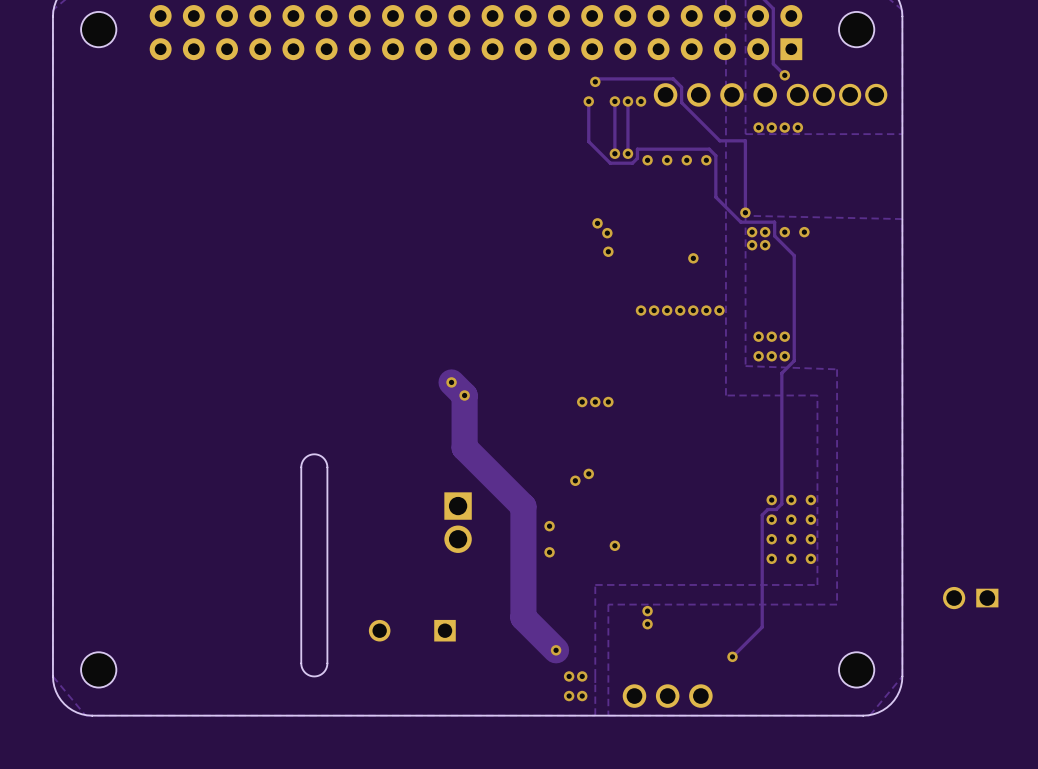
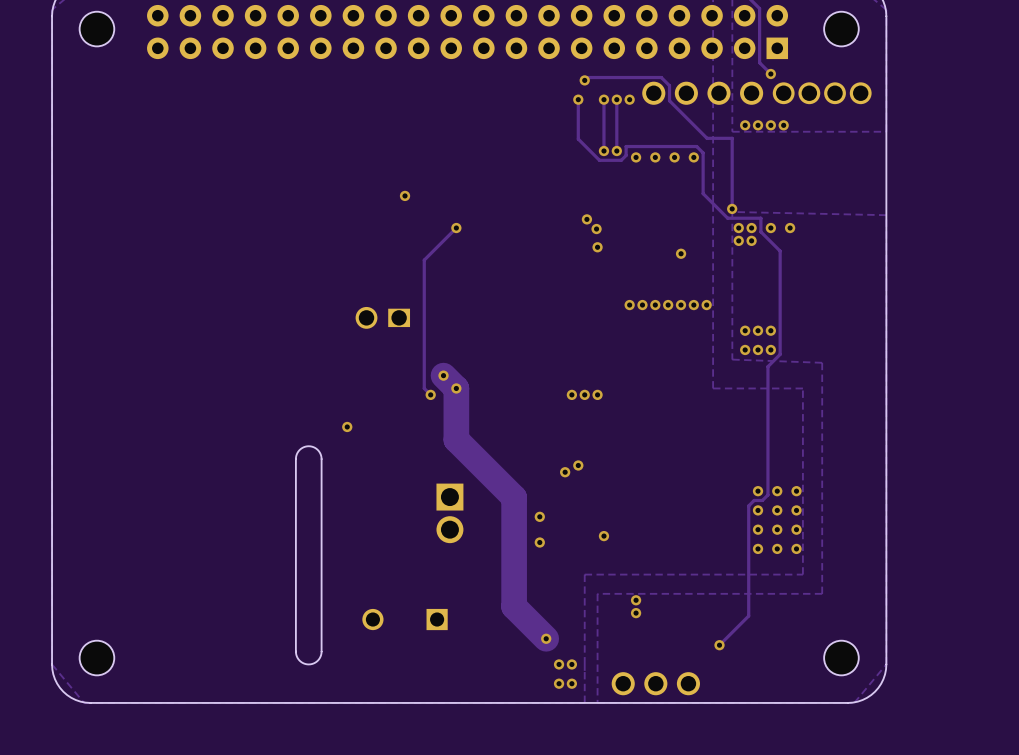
via: none -> (405, 195)
track: none -> (456, 228) (424, 260) (424, 388) (430, 394)
via: none -> (456, 228)
part: none -> (382, 317)
via: none -> (430, 394)
via: none -> (347, 426)
part: (970, 598) -> none

